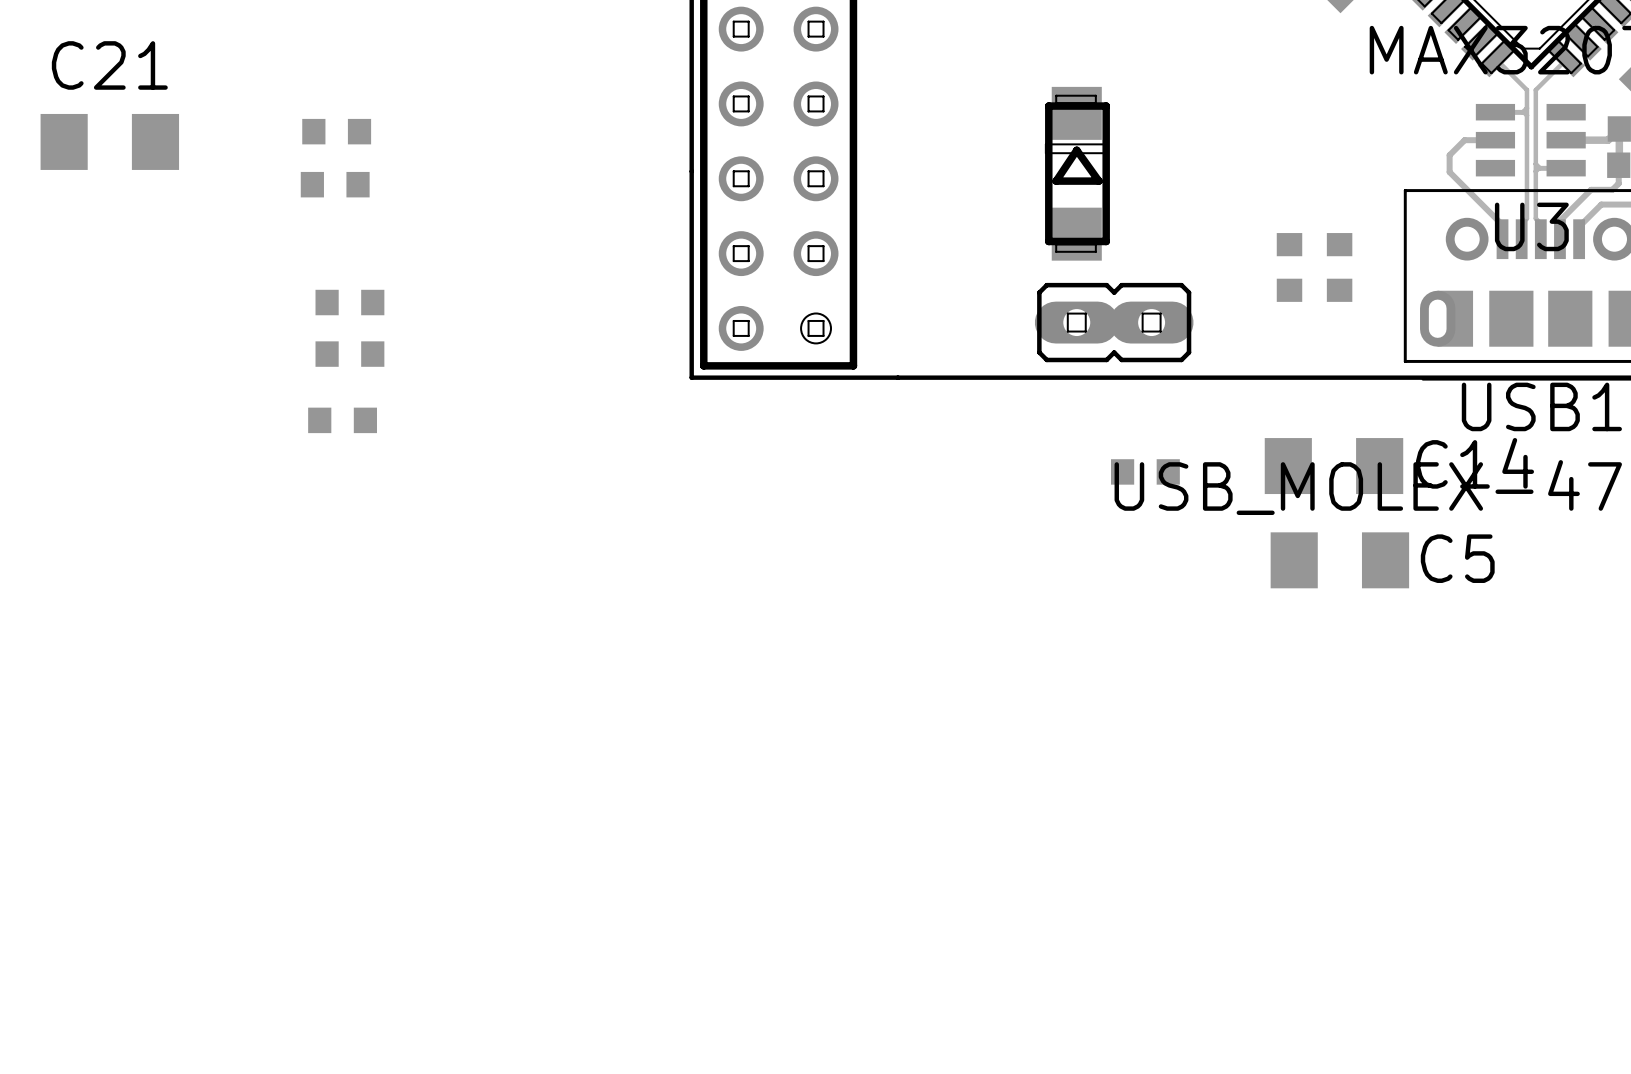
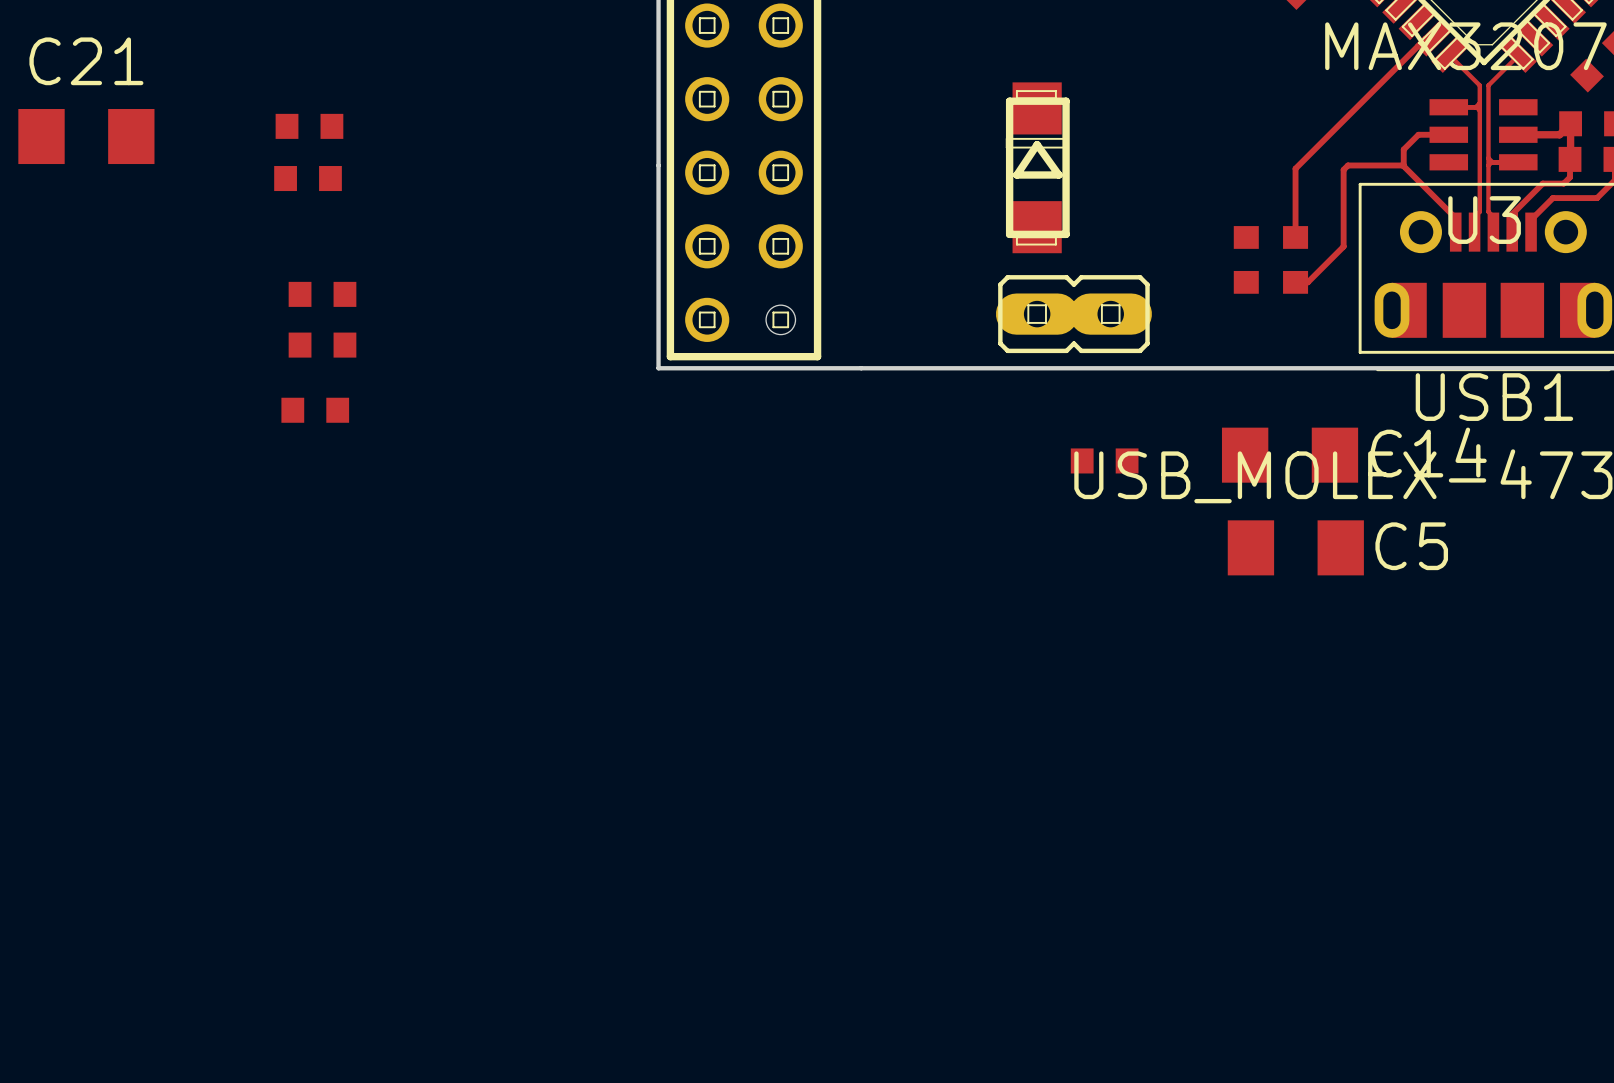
track: none -> (1432, 38) (1425, 38) (1295, 168) (1295, 237)
track: none -> (1403, 165) (1347, 165) (1343, 169) (1343, 246) (1307, 282) (1295, 282)

